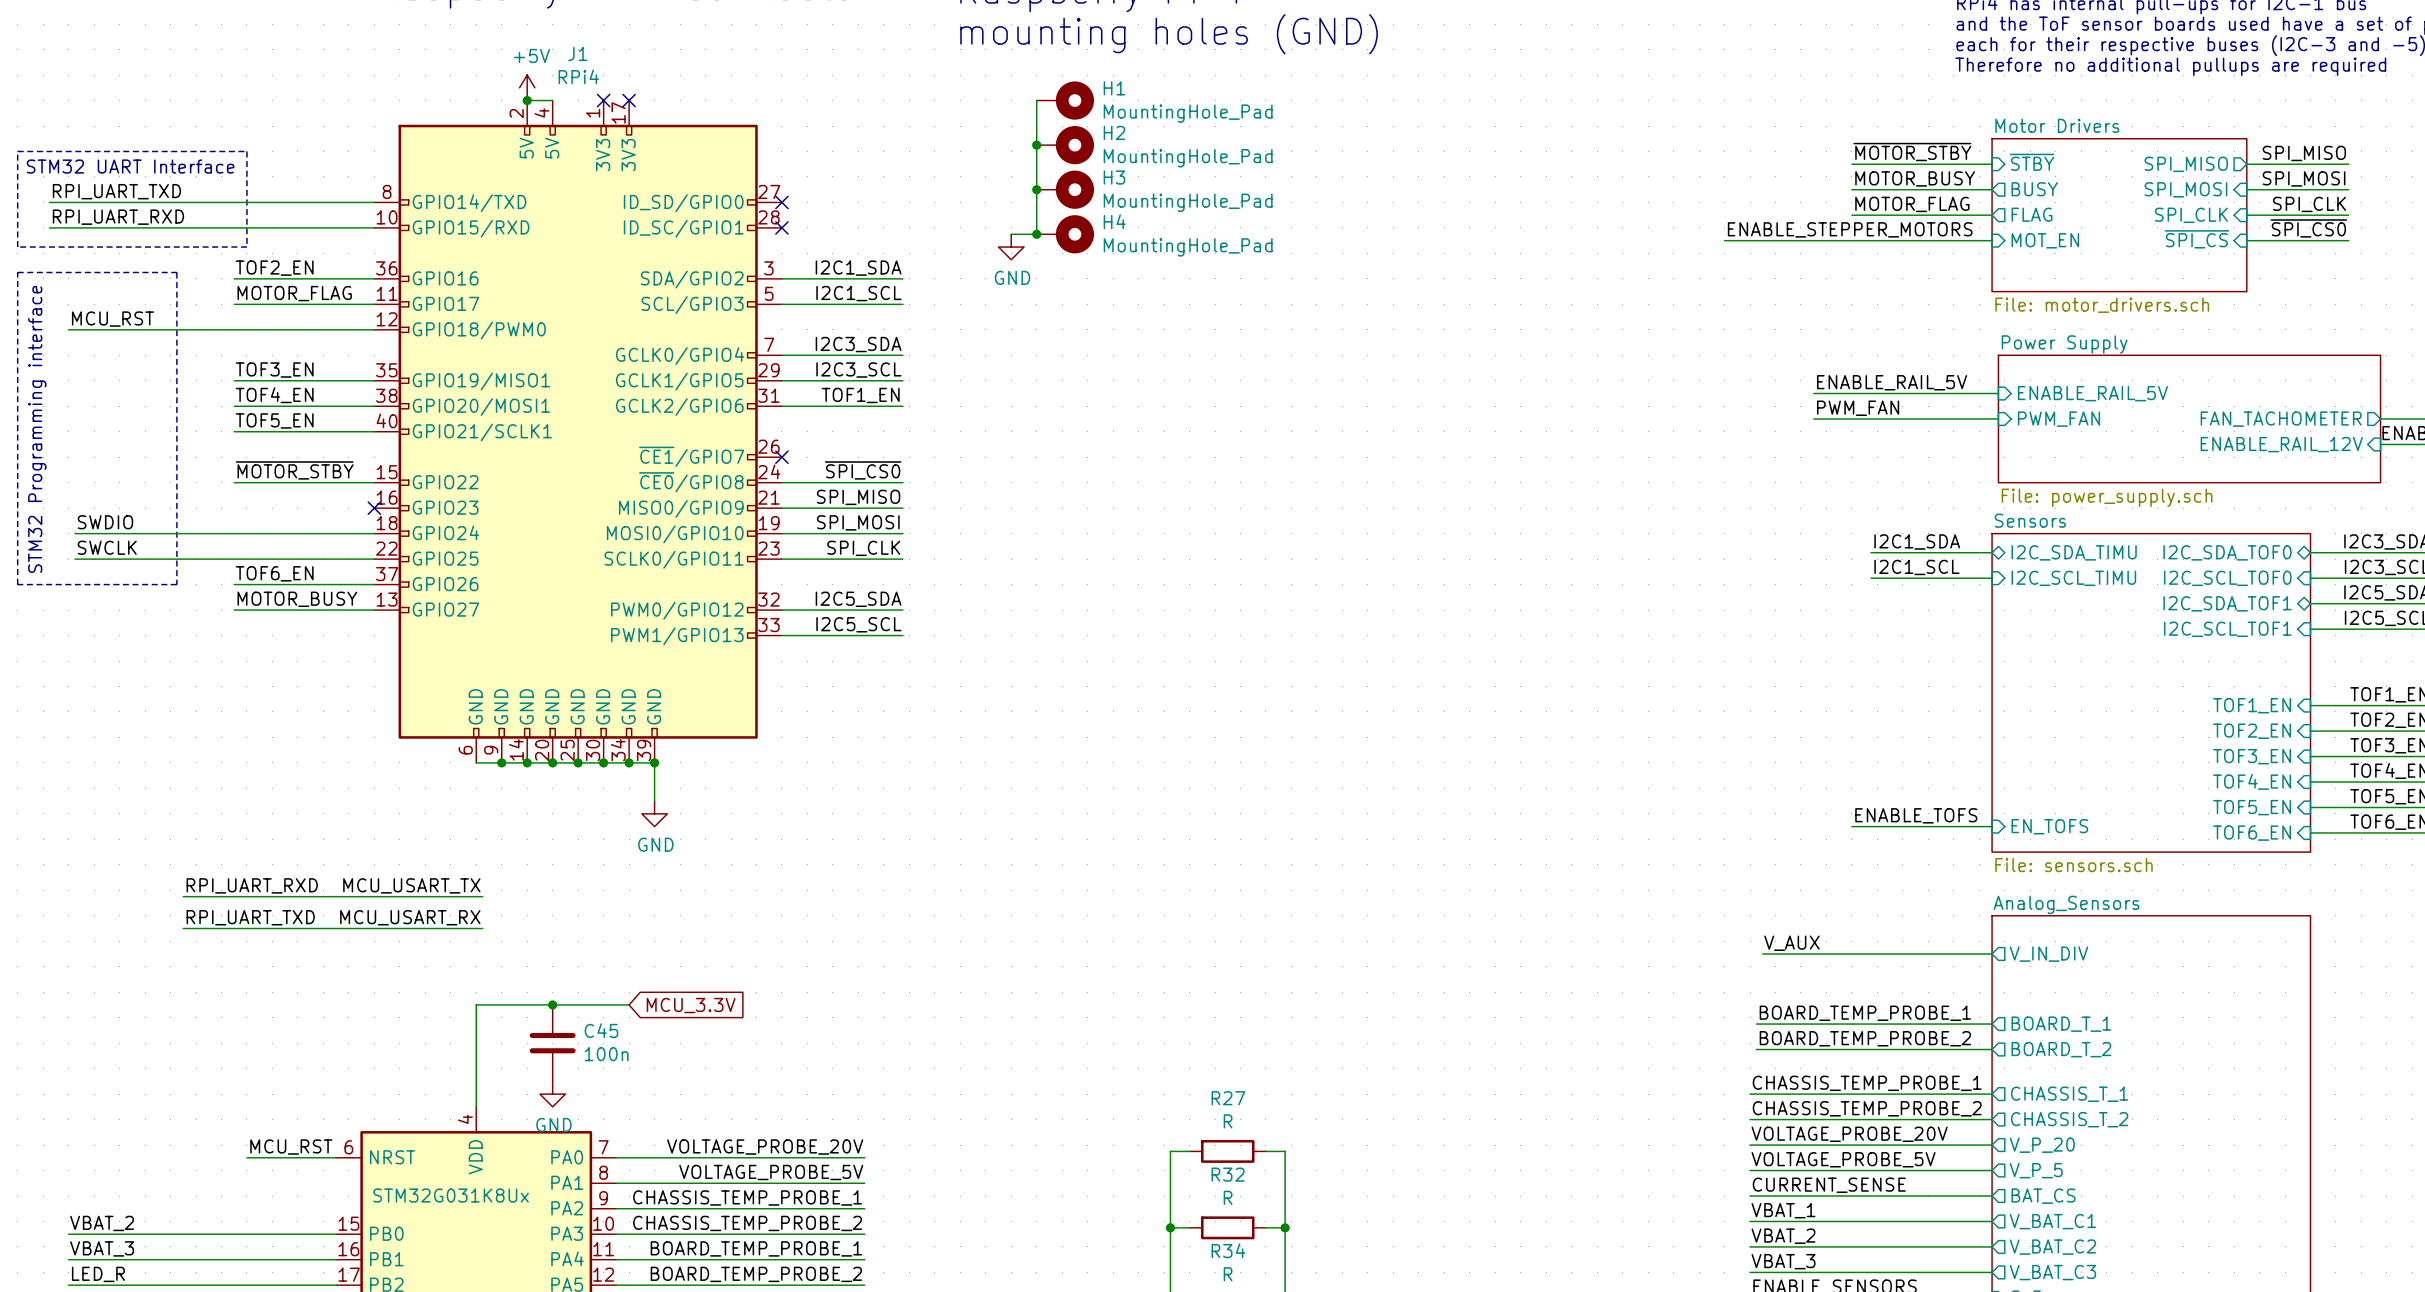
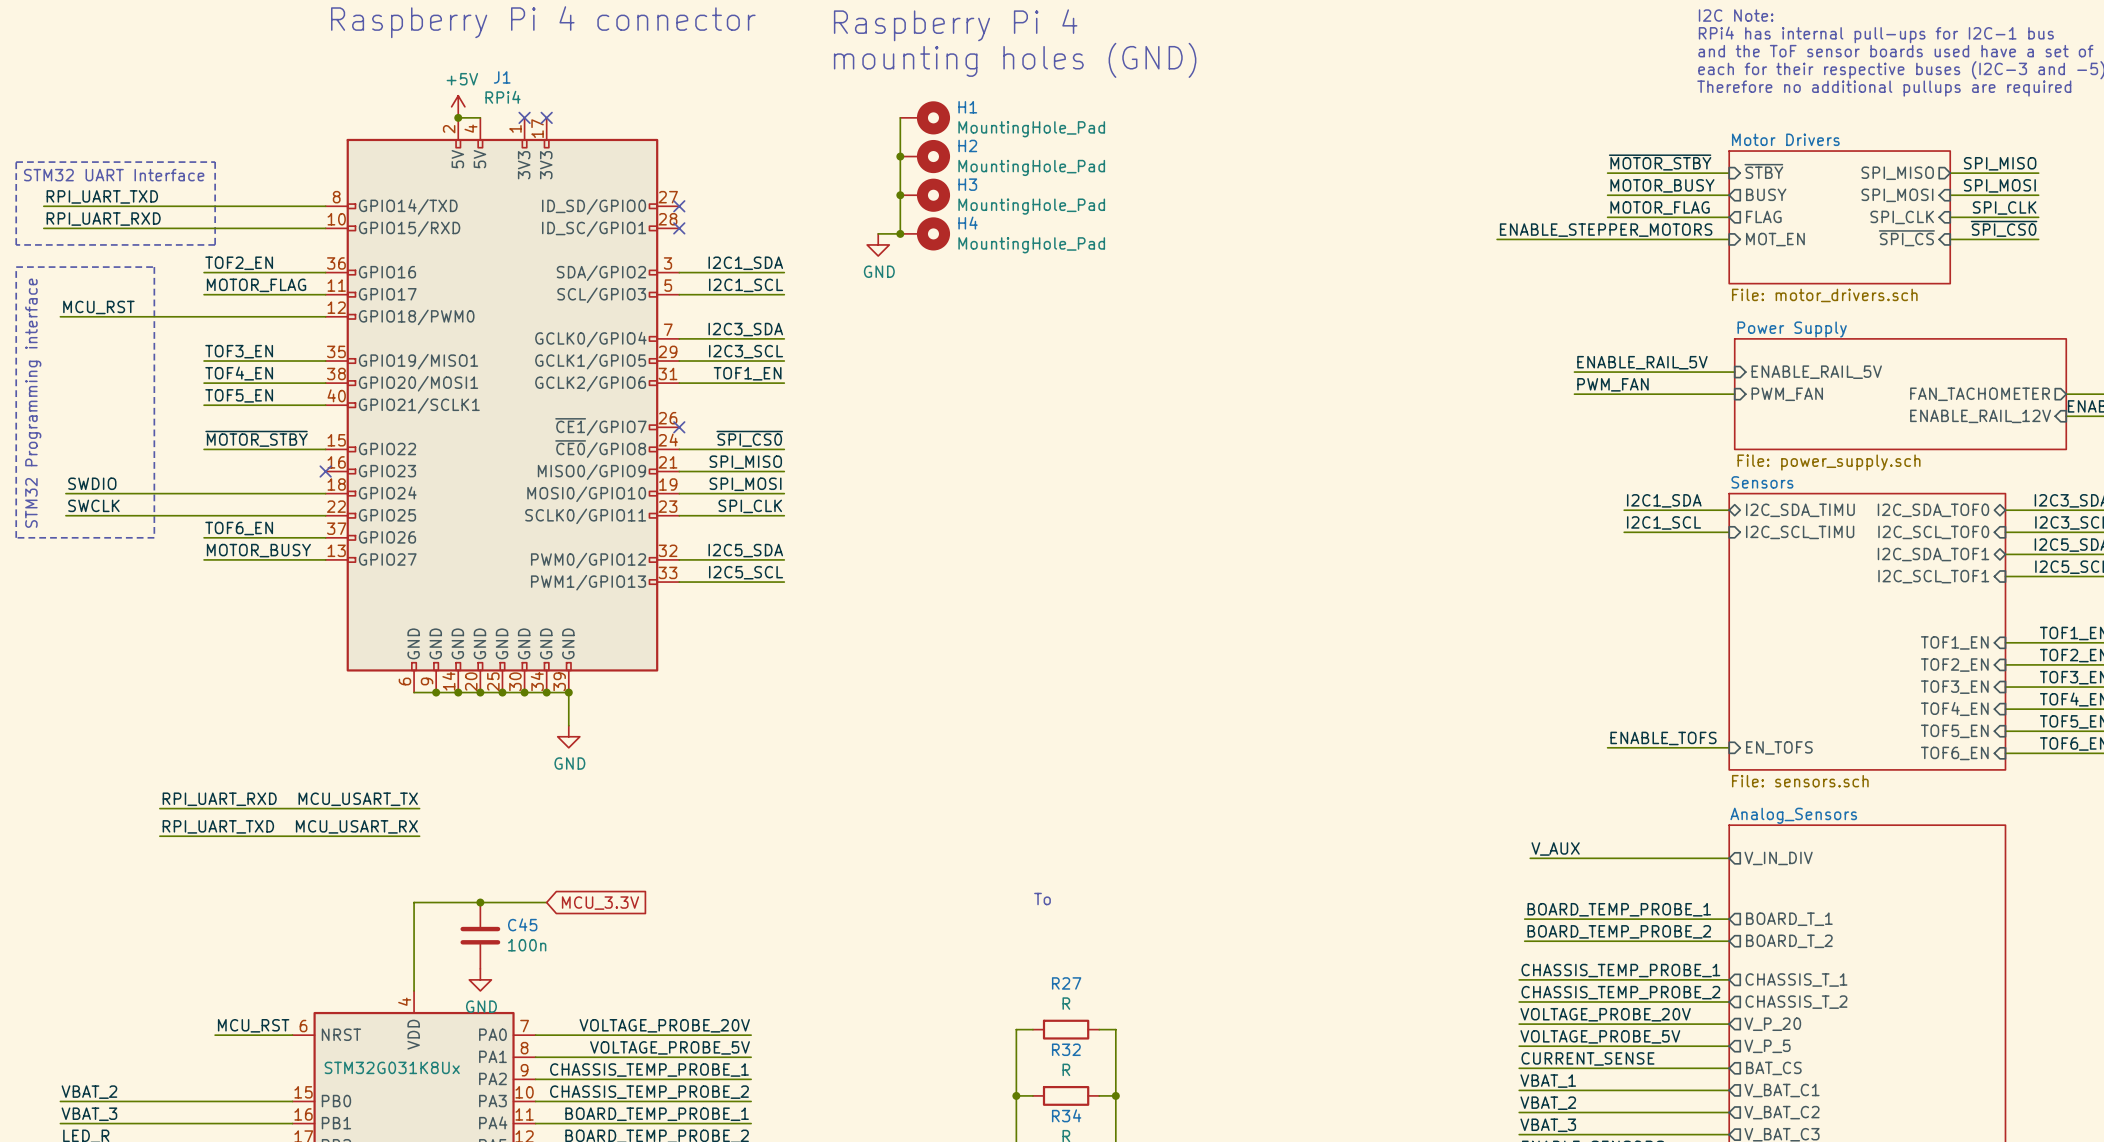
text: none -> To (1042, 899)

